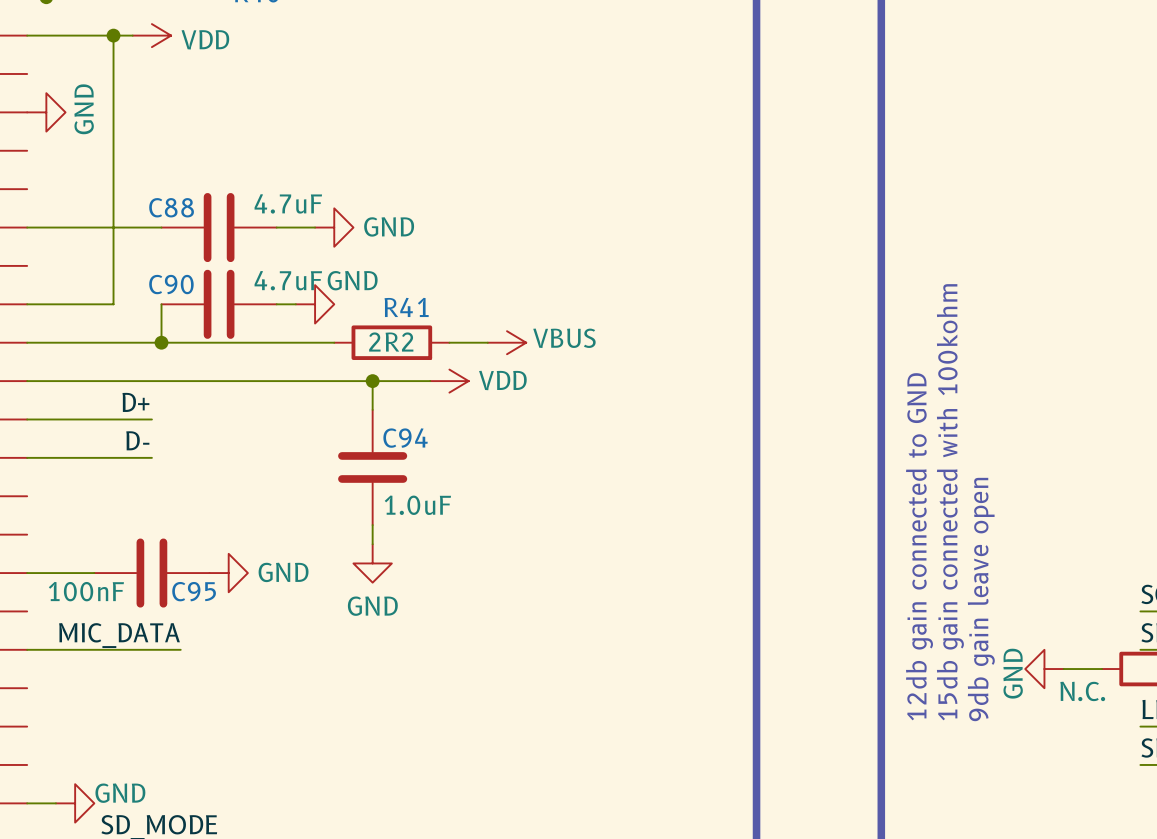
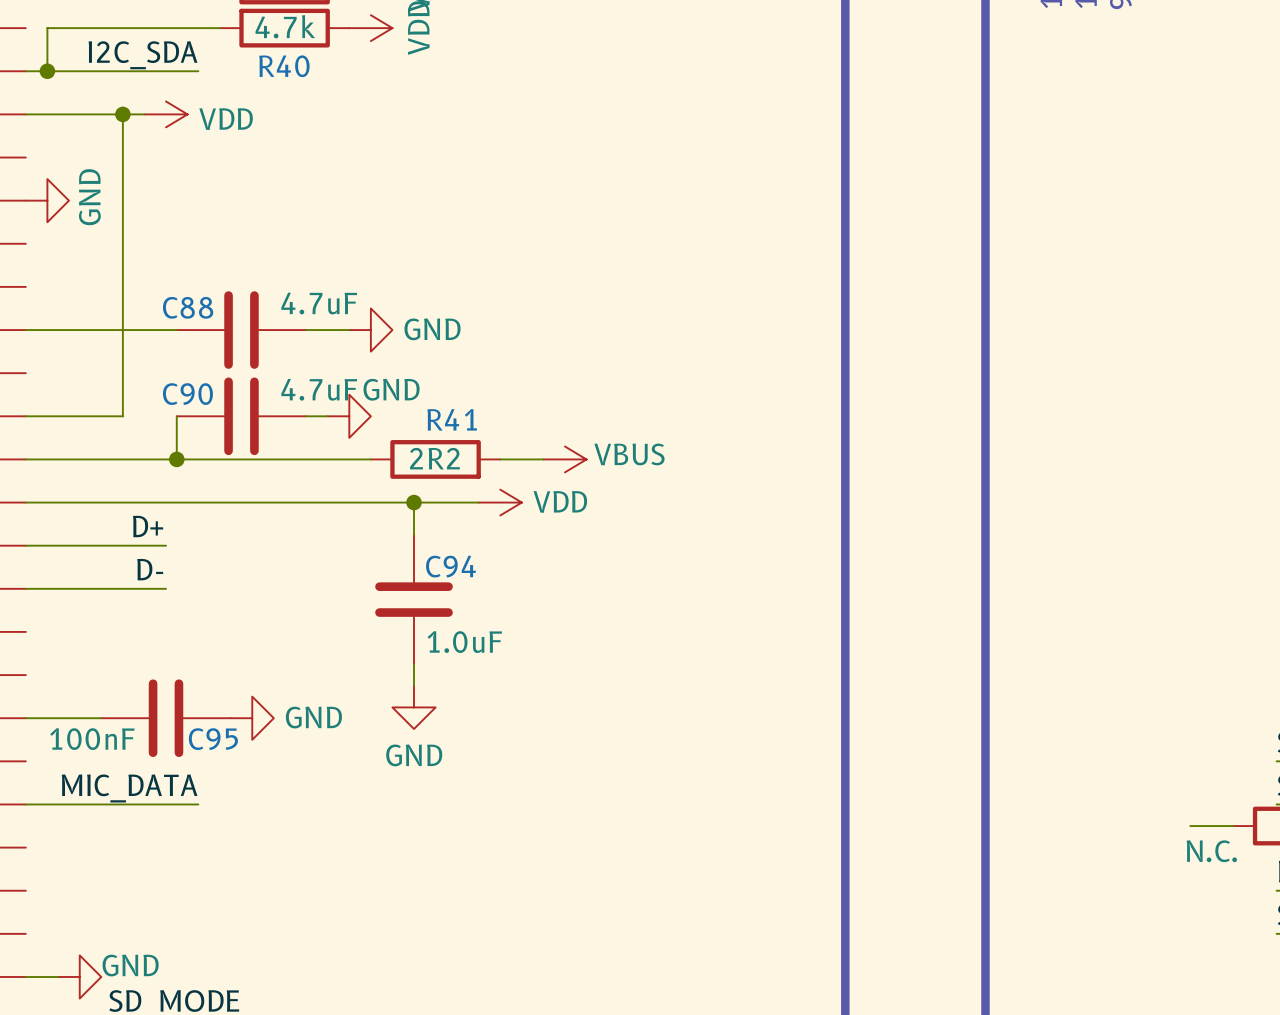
text: 15db gain connected with 100kohm (950, 502) -> none
text: 12db gain connected to GND (919, 546) -> none
text: 9db gain leave open (981, 599) -> none
power symbol: GND (1044, 669) -> none

